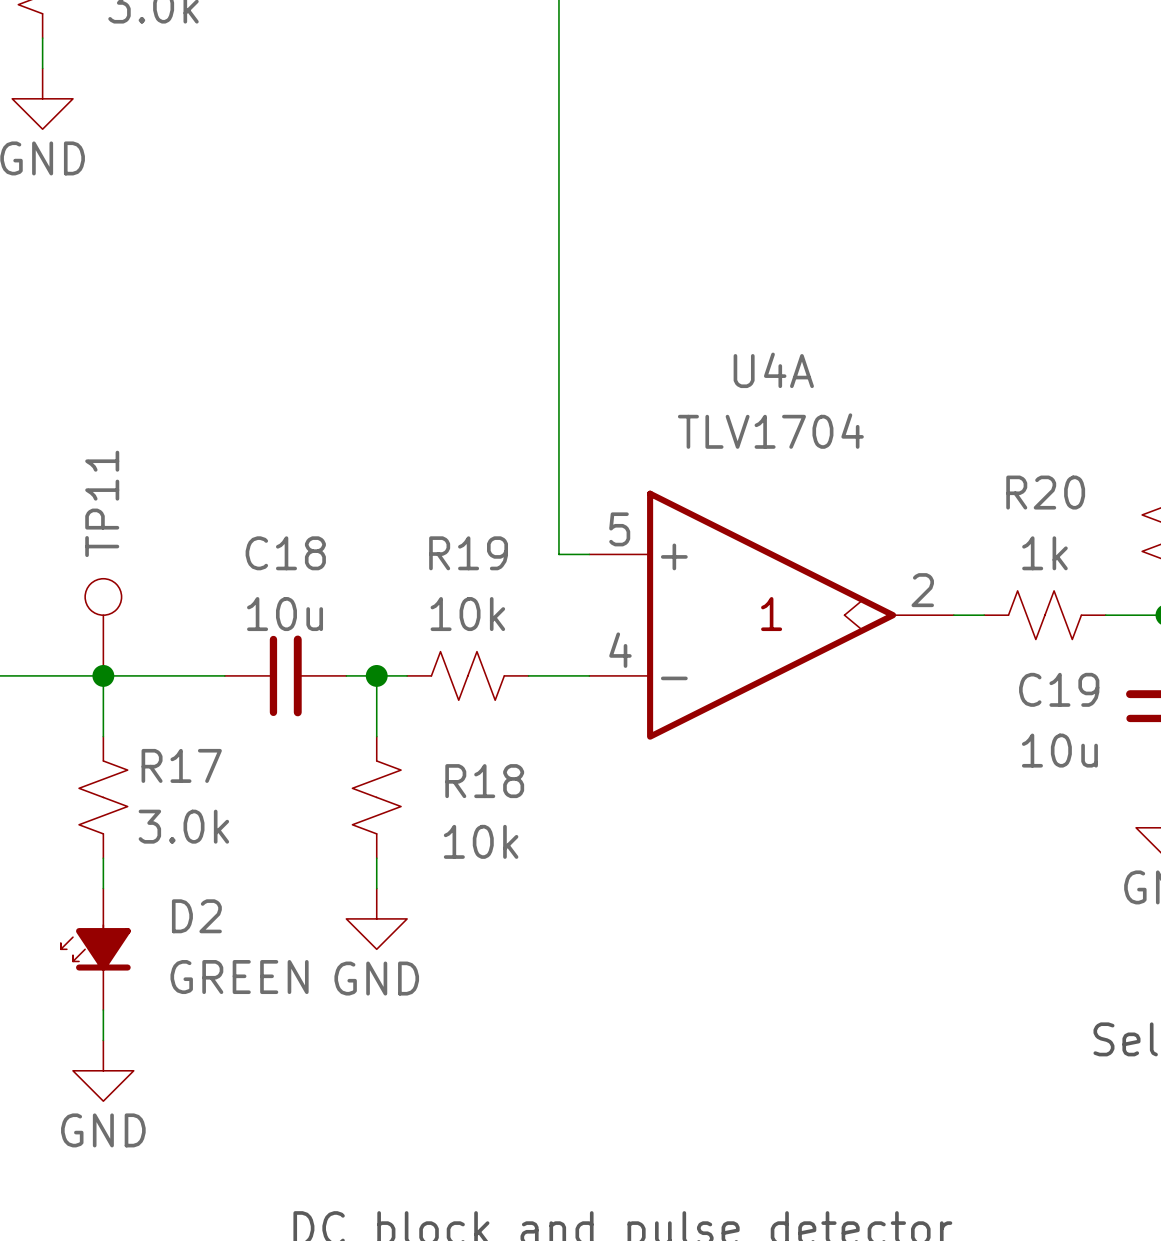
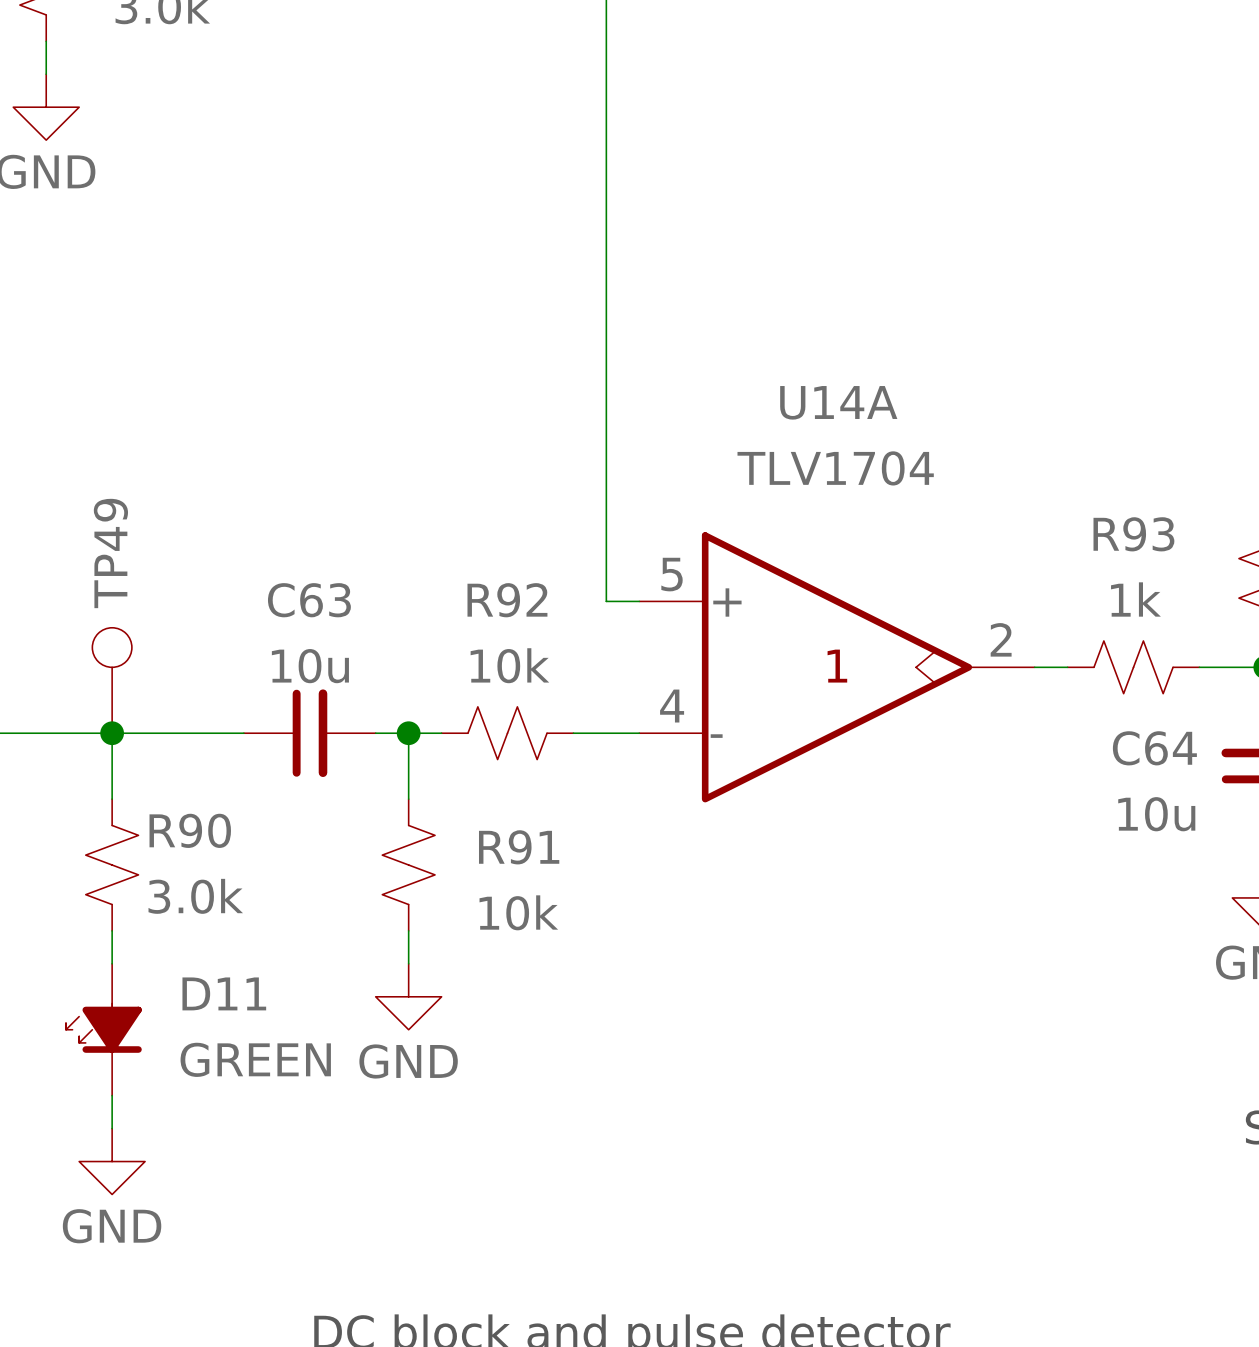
U4A name: U4A (773, 370) -> U14A (838, 402)
R20 name: R20 (1045, 492) -> R93 (1133, 534)
TP11 name: TP11 (102, 503) -> TP49 (110, 553)
C18 name: C18 (285, 553) -> C63 (309, 600)
R19 name: R19 (468, 553) -> R92 (507, 600)
C19 name: C19 (1059, 689) -> C64 (1154, 748)
R17 name: R17 (181, 765) -> R90 (190, 830)
R18 name: R18 (484, 781) -> R91 (519, 847)
D2 name: D2 (196, 916) -> D11 (224, 993)

